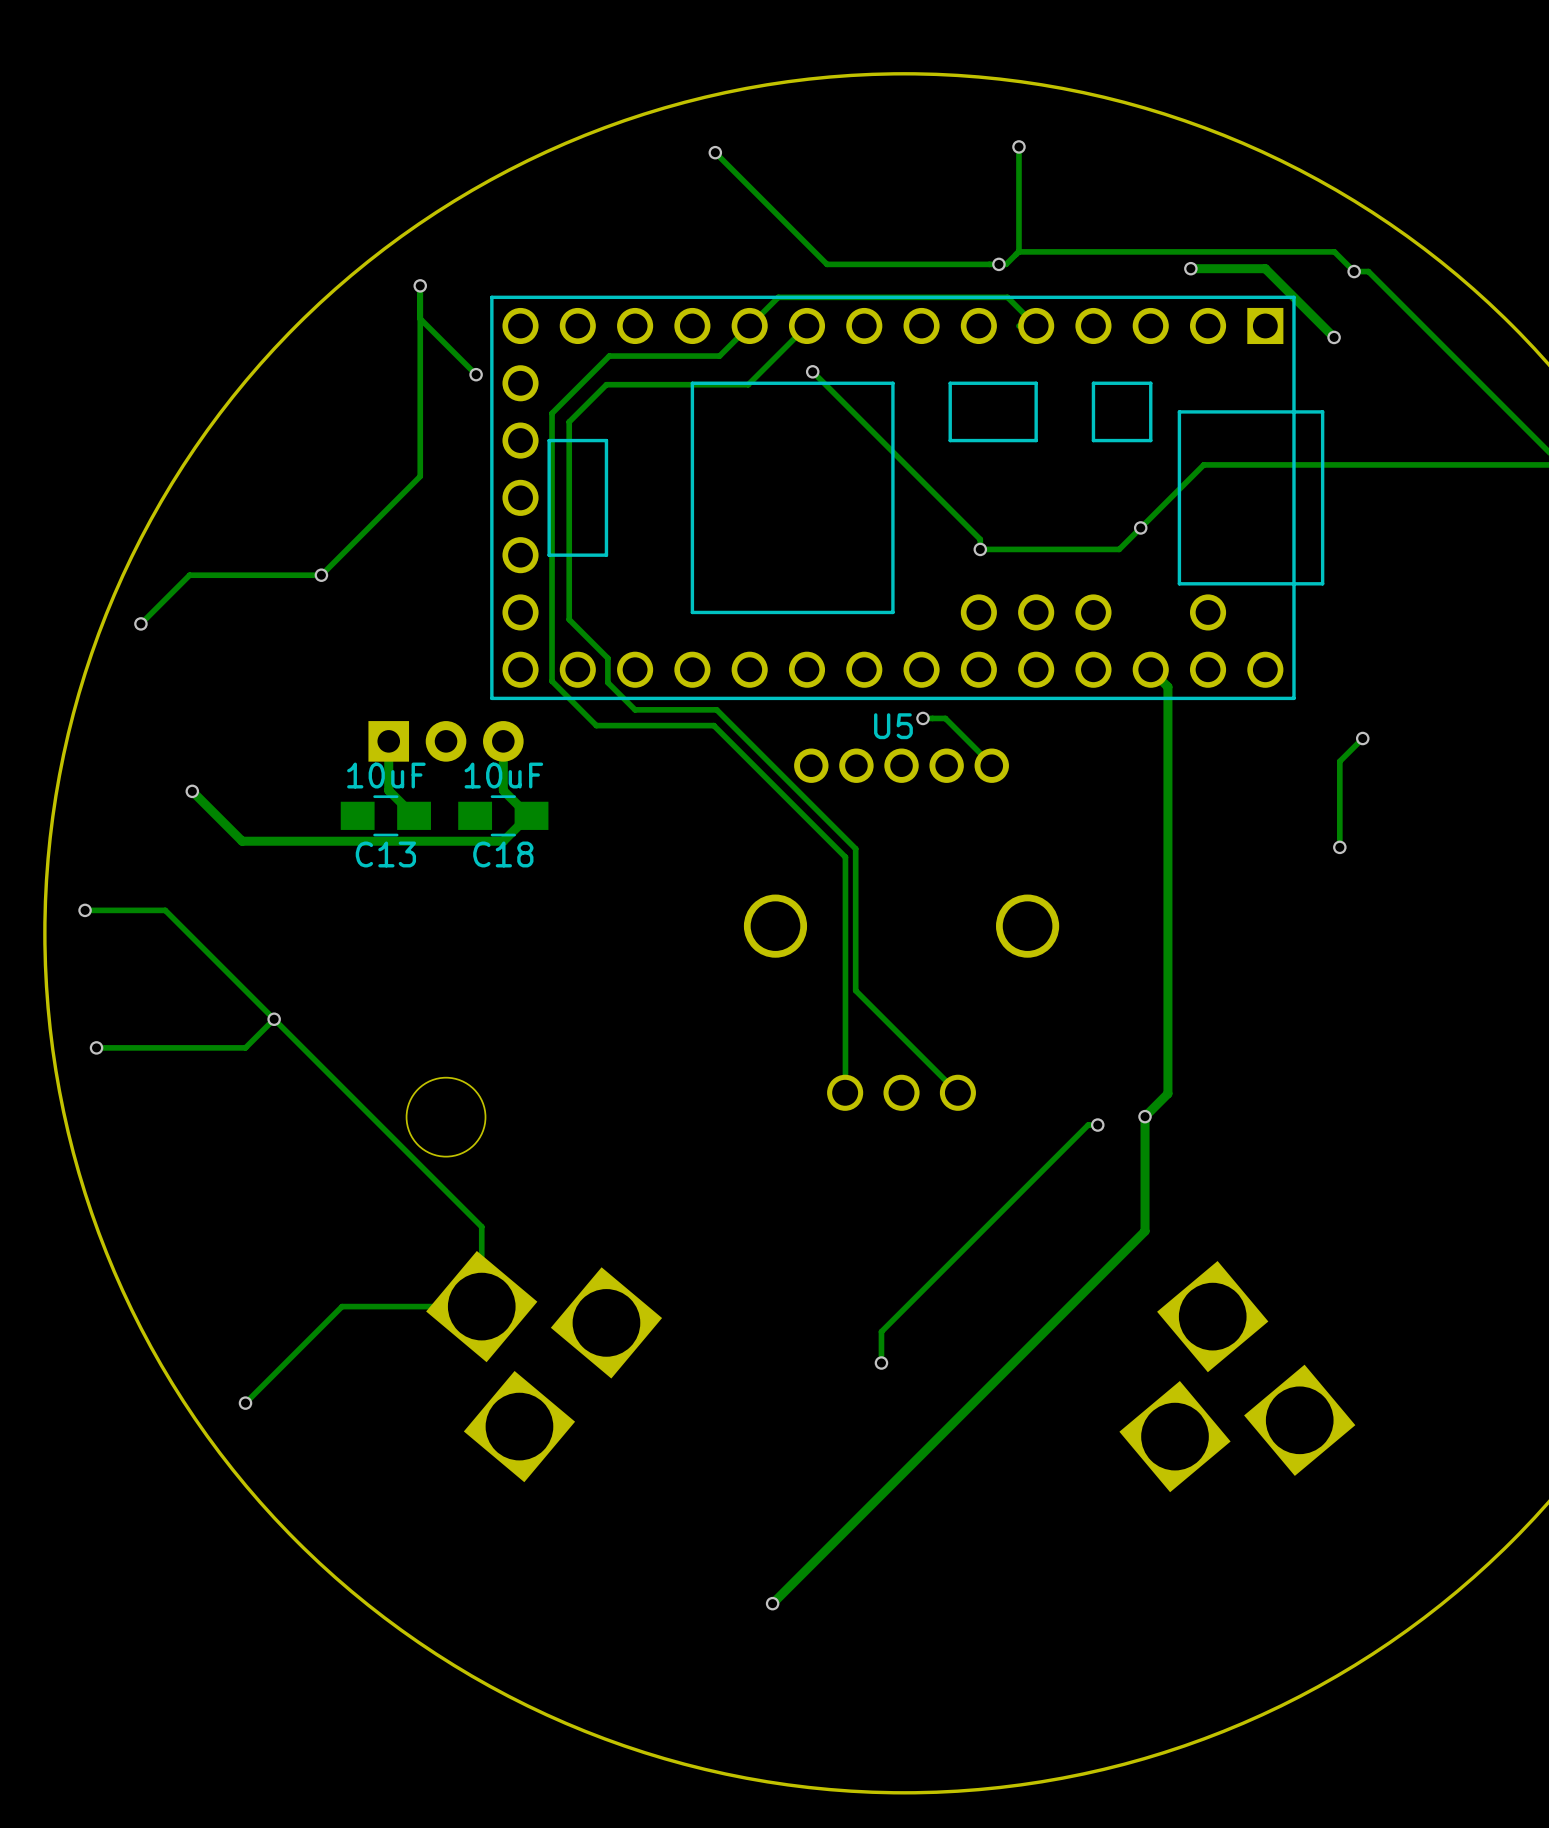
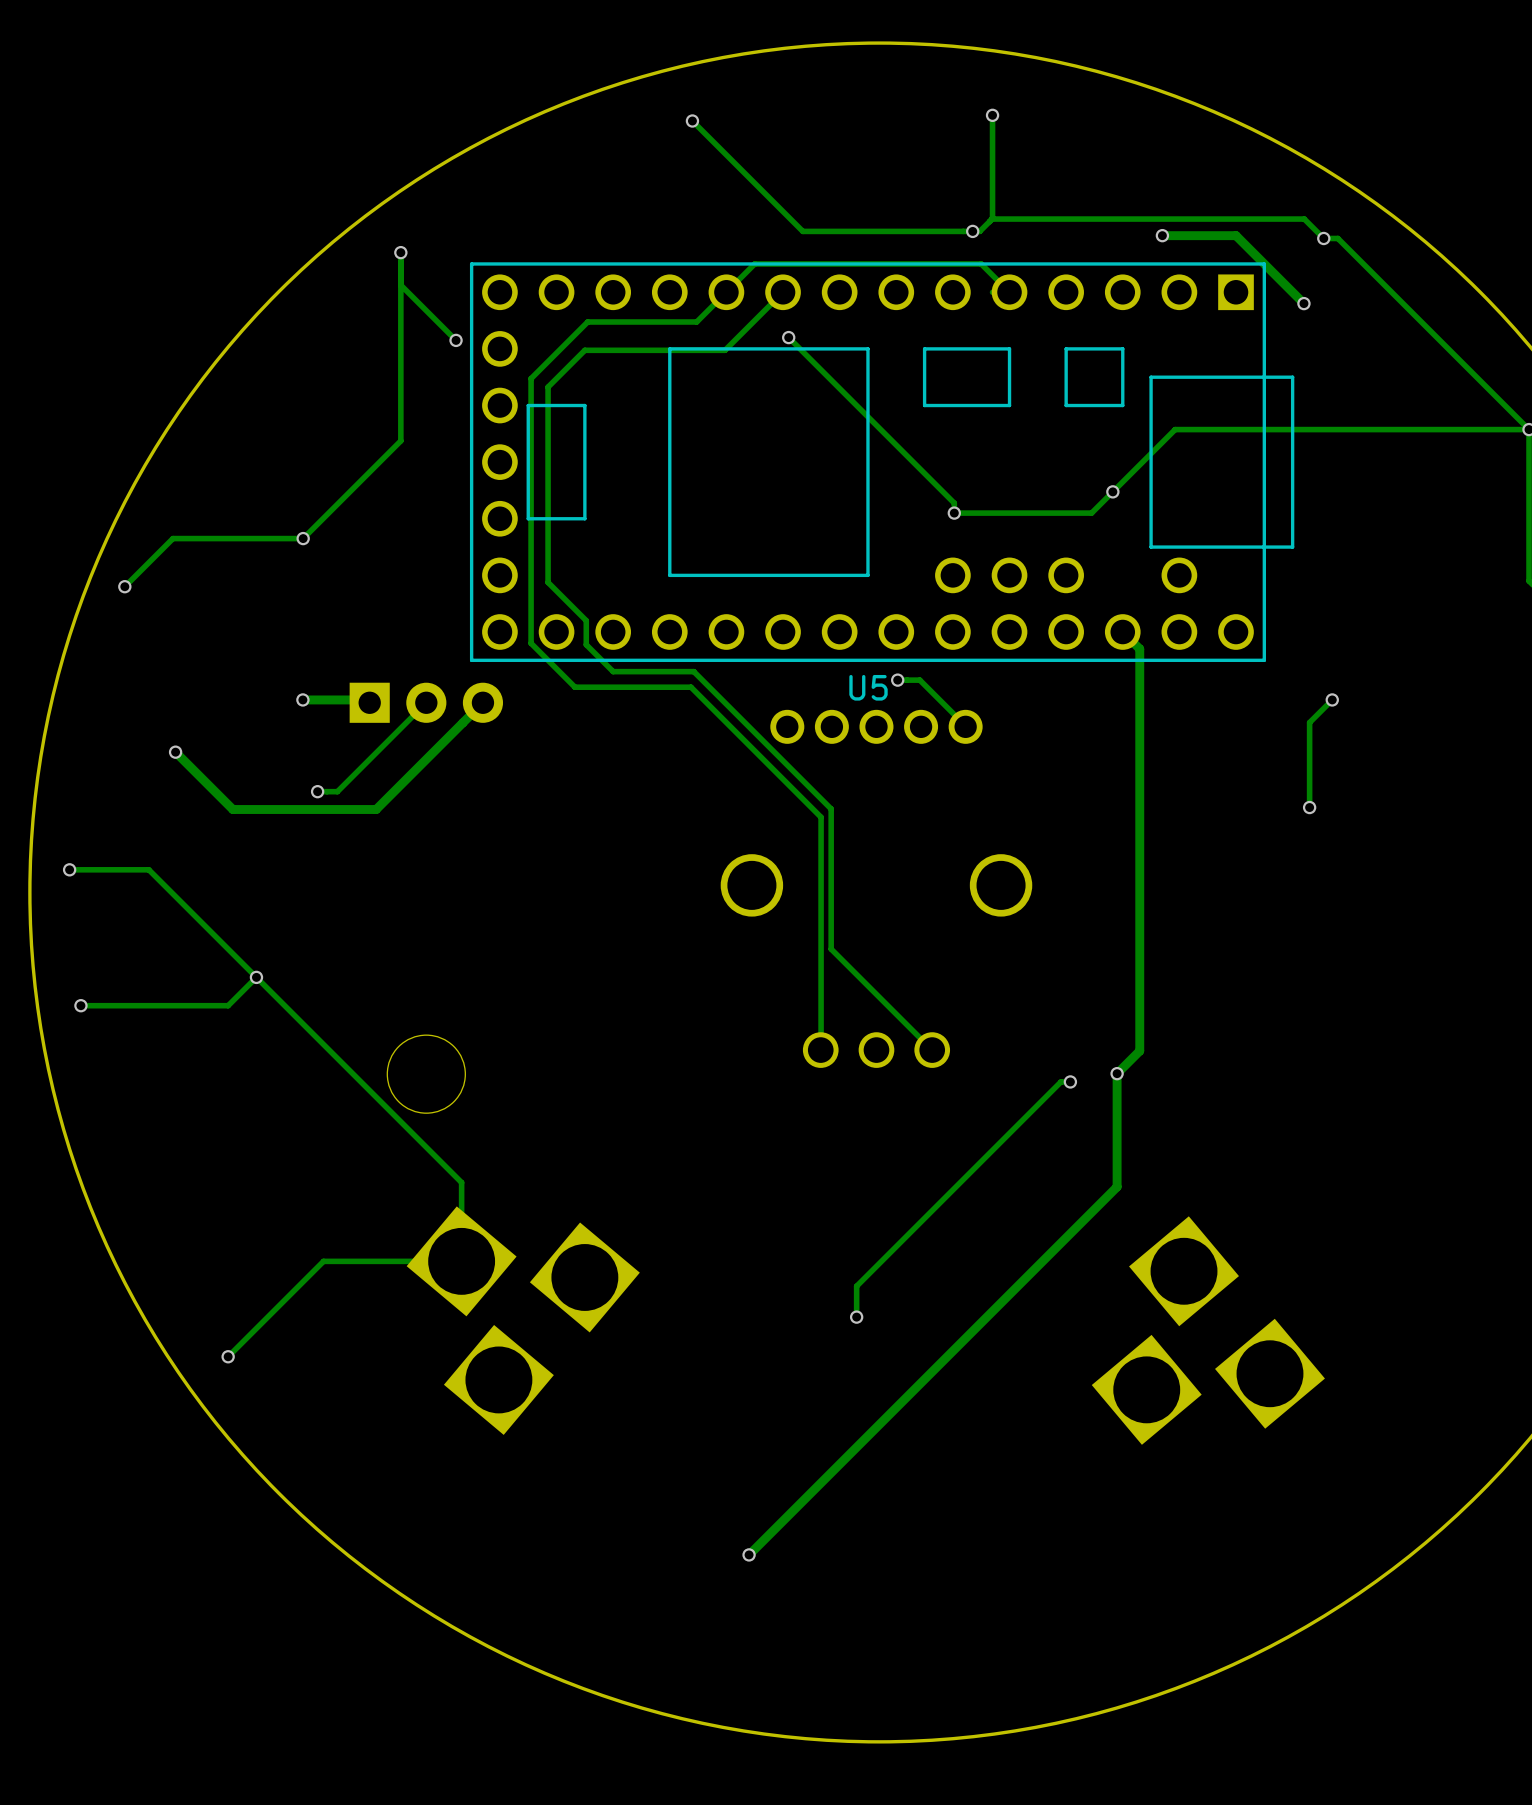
track: none -> (302, 699) (366, 699) (369, 702)
via: none -> (302, 699)
track: (388, 738) (388, 790) (414, 815) -> none
track: (503, 738) (503, 790) (528, 815) -> none
track: none -> (426, 702) (337, 791) (317, 791)
C13: 10uF (385, 815) -> none
C18: 10uF (503, 815) -> none
track: (528, 815) (503, 841) (242, 841) -> (482, 702) (376, 809) (232, 809) (224, 801)
via: none -> (317, 791)

